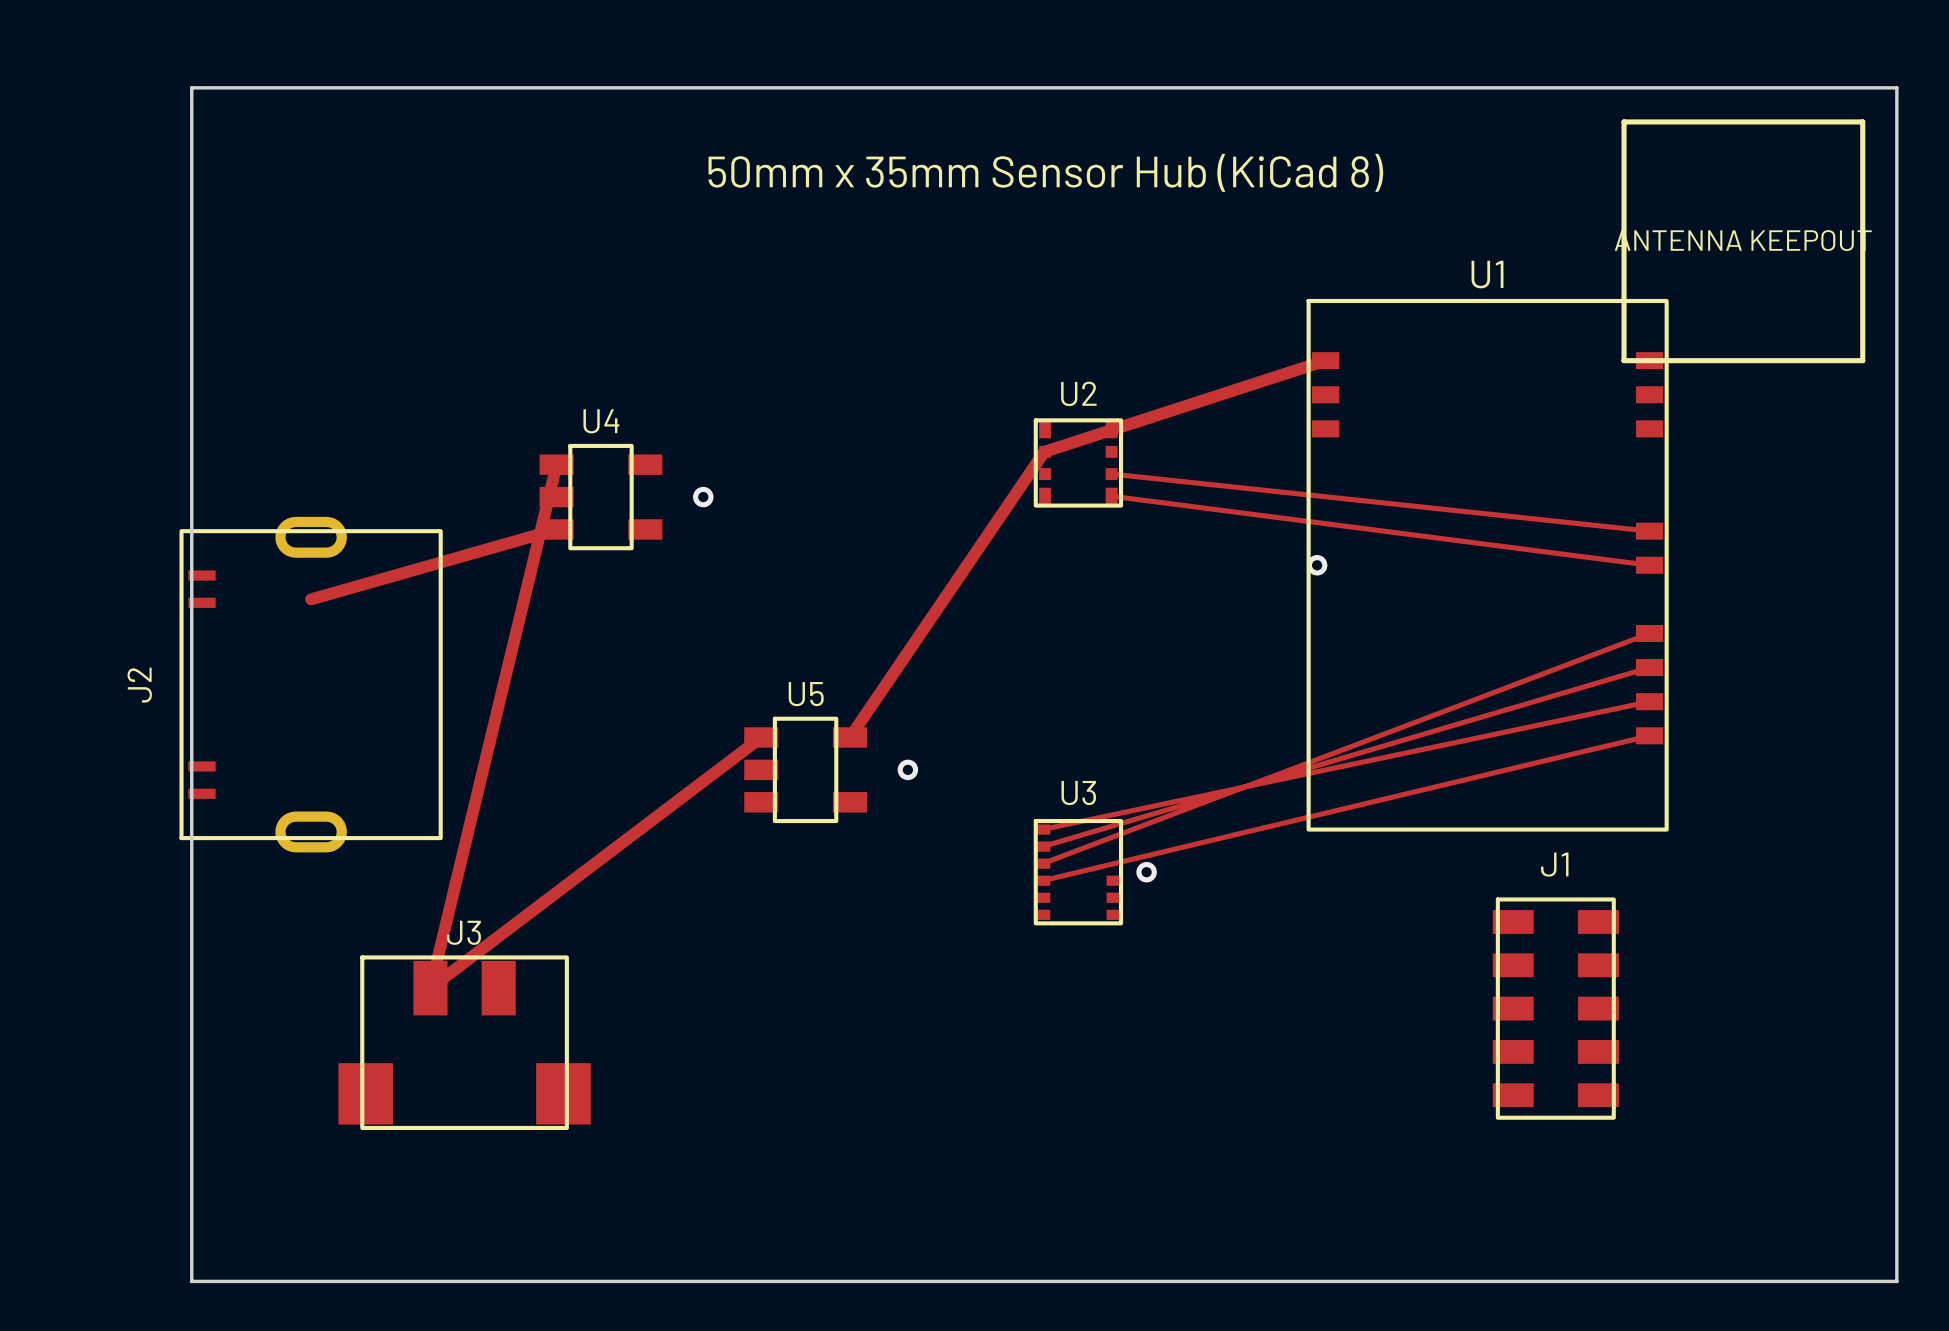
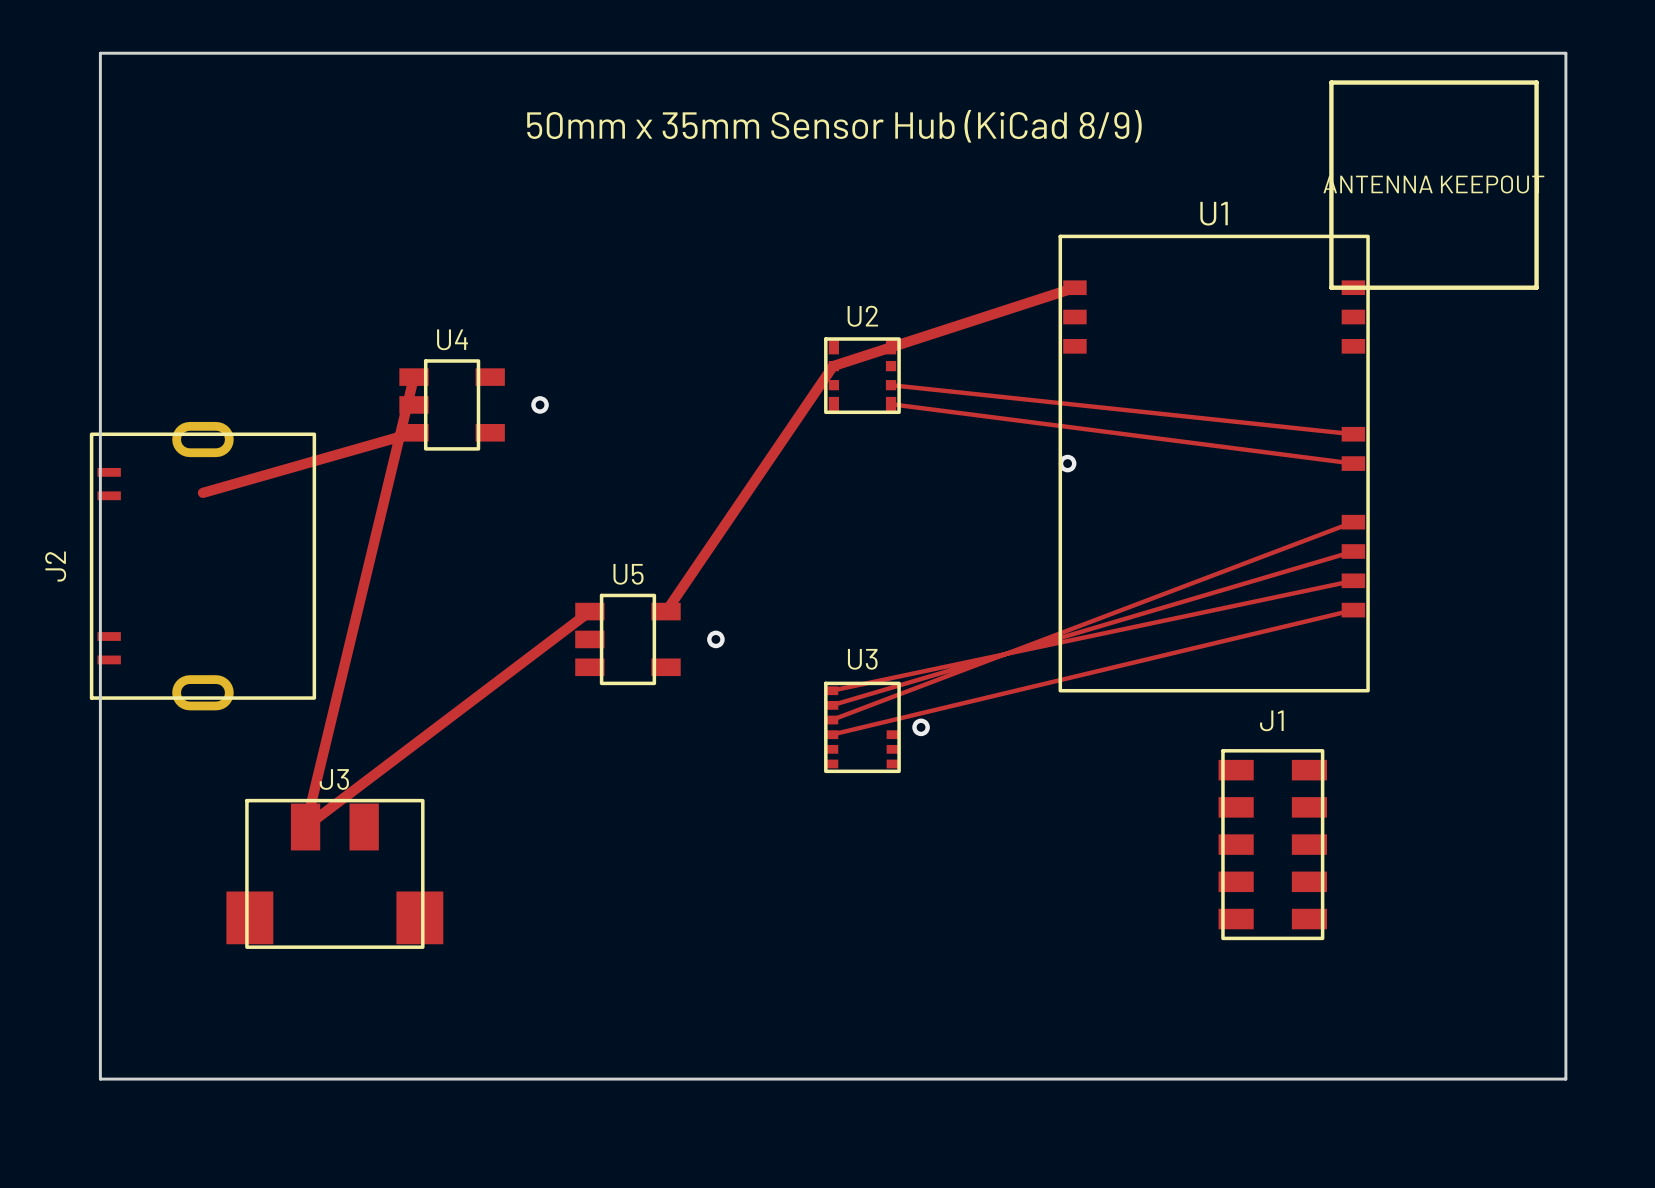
text: 50mm x 35mm Sensor Hub (KiCad 8) (1045, 172) -> 50mm x 35mm Sensor Hub (KiCad 8/9) (834, 126)

